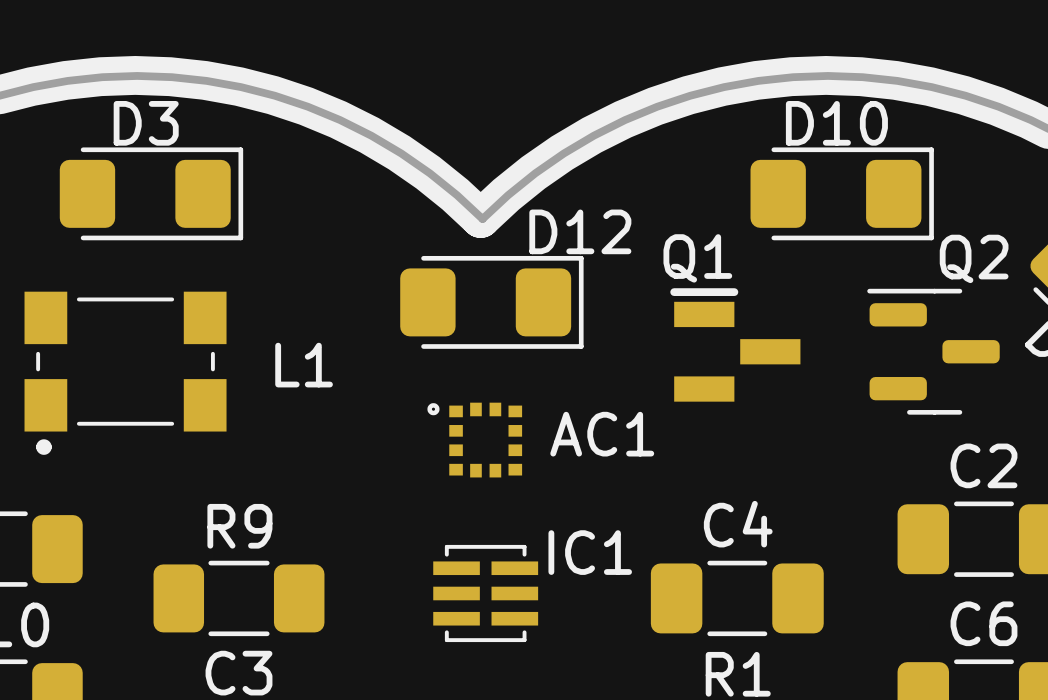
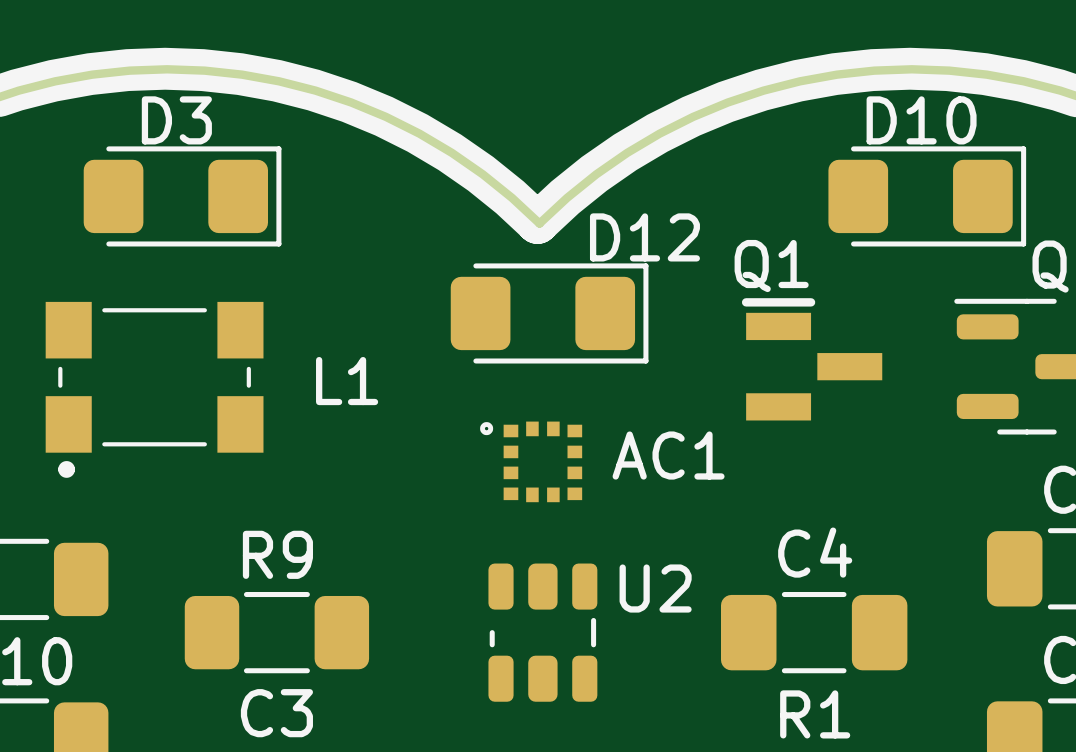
IC1: (485, 593) -> none
U2: none -> (542, 632)

